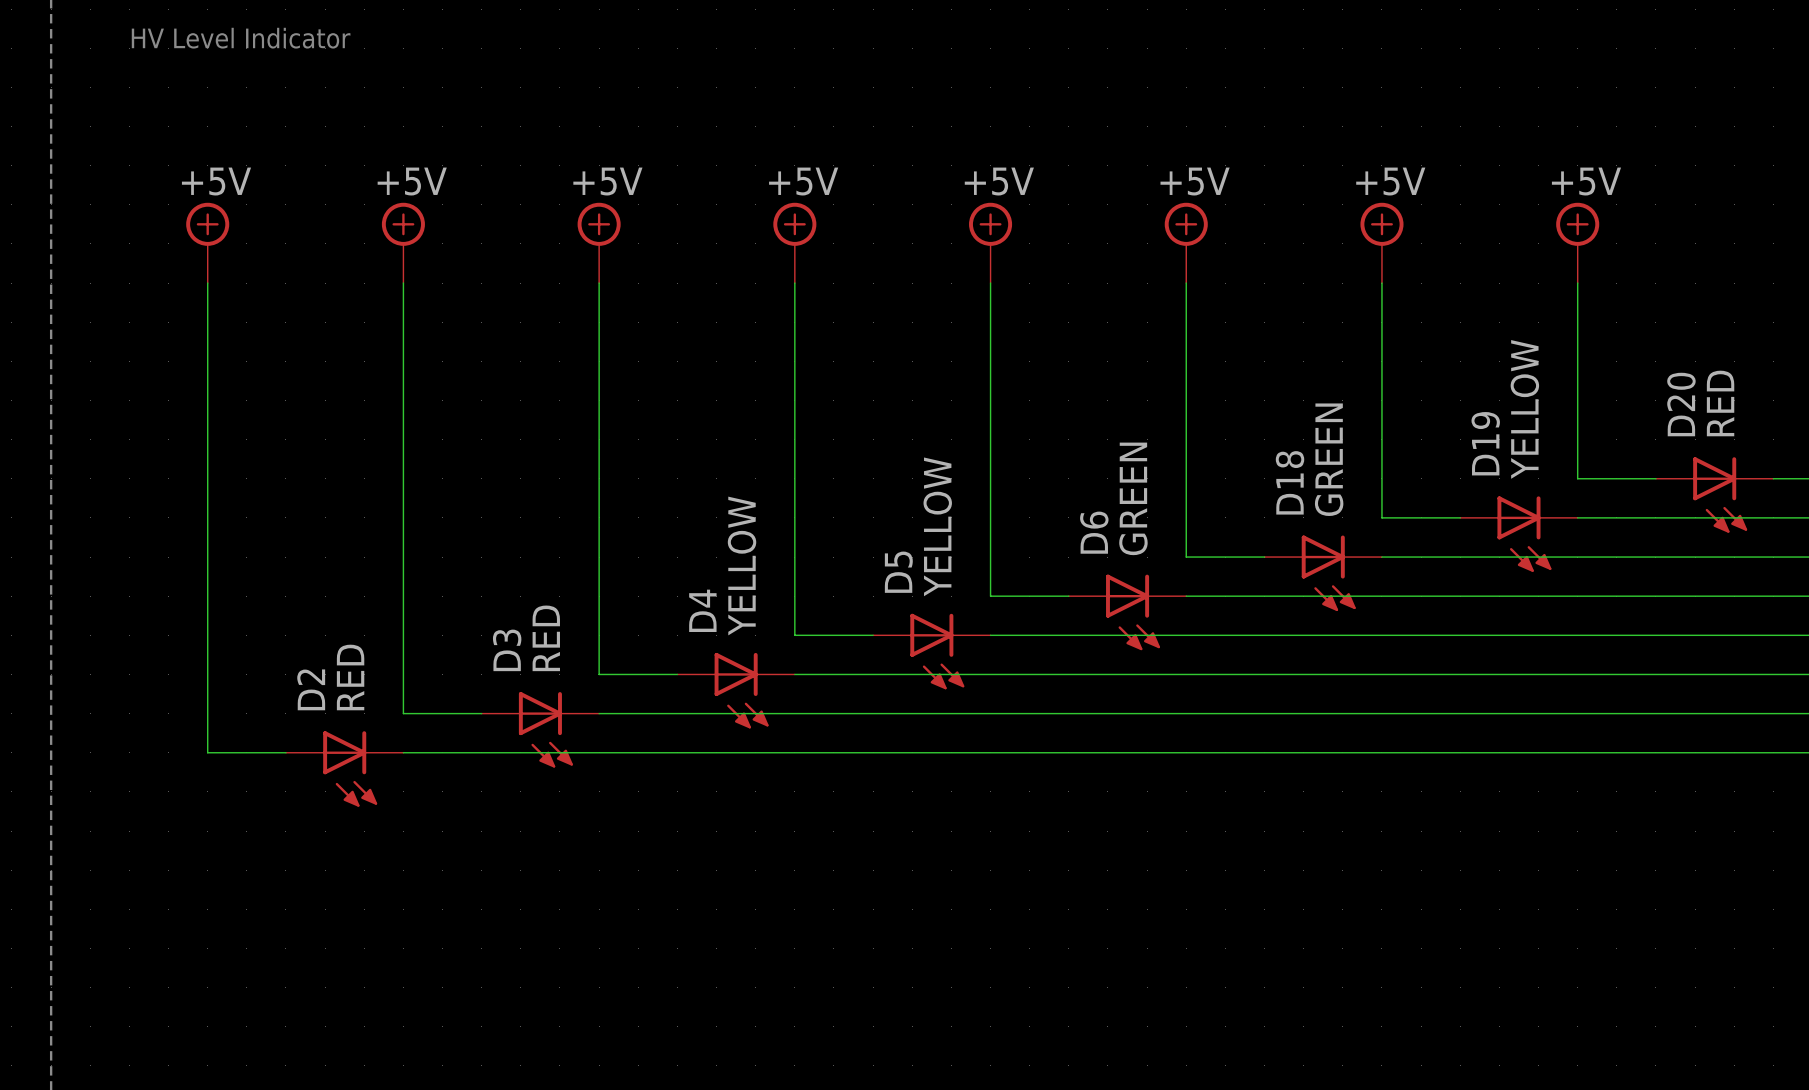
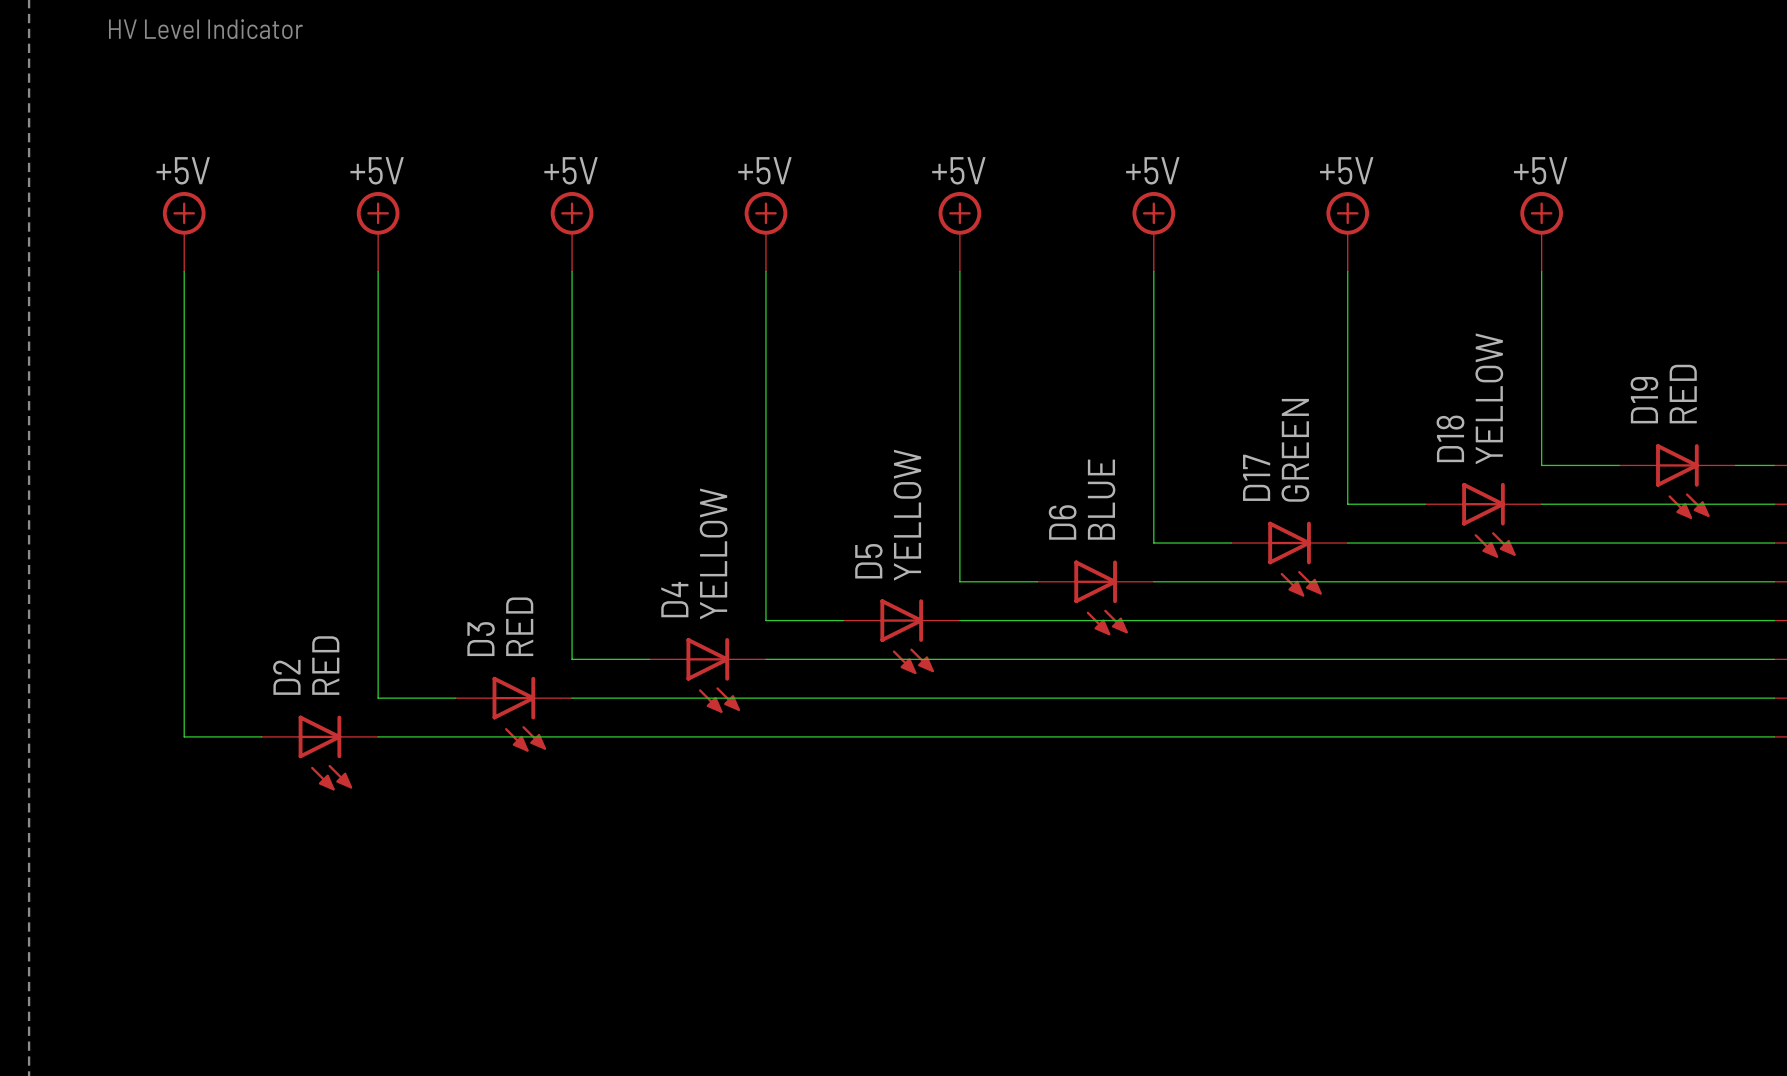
D20 name: D20 (1681, 404) -> D19 (1644, 400)
D19 name: D19 (1485, 443) -> D18 (1450, 438)
D18 name: D18 (1290, 482) -> D17 (1256, 477)
D6 value: GREEN (1133, 498) -> BLUE (1101, 499)

